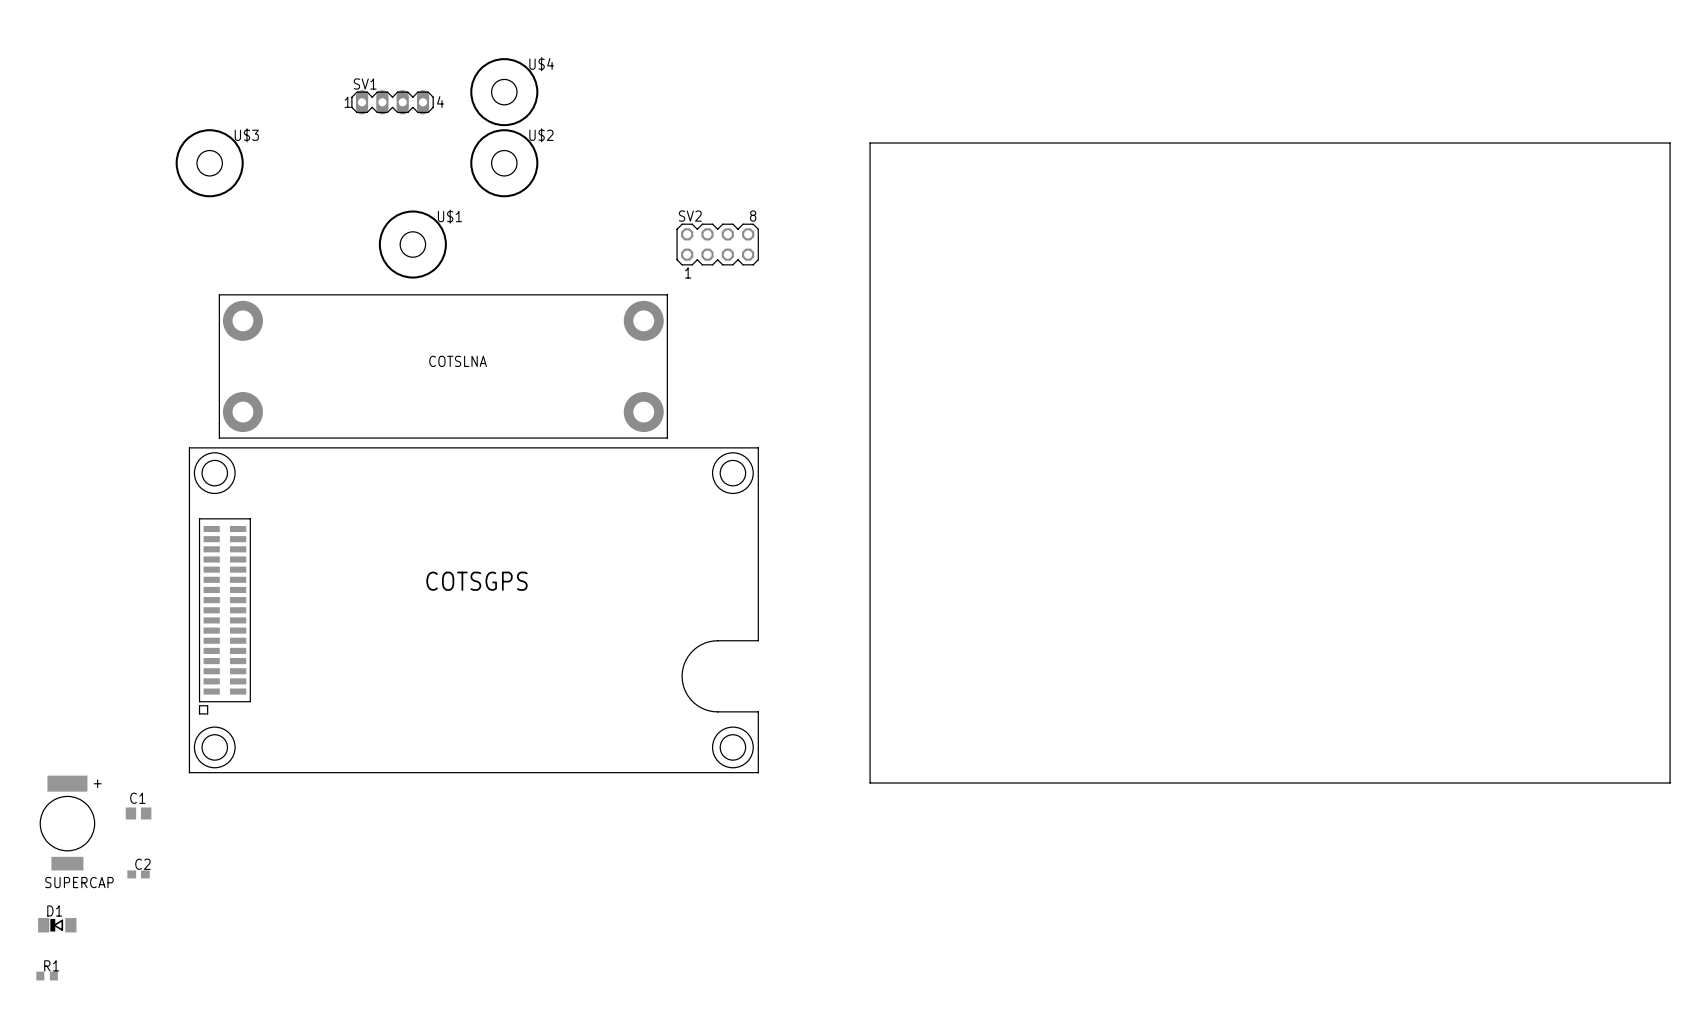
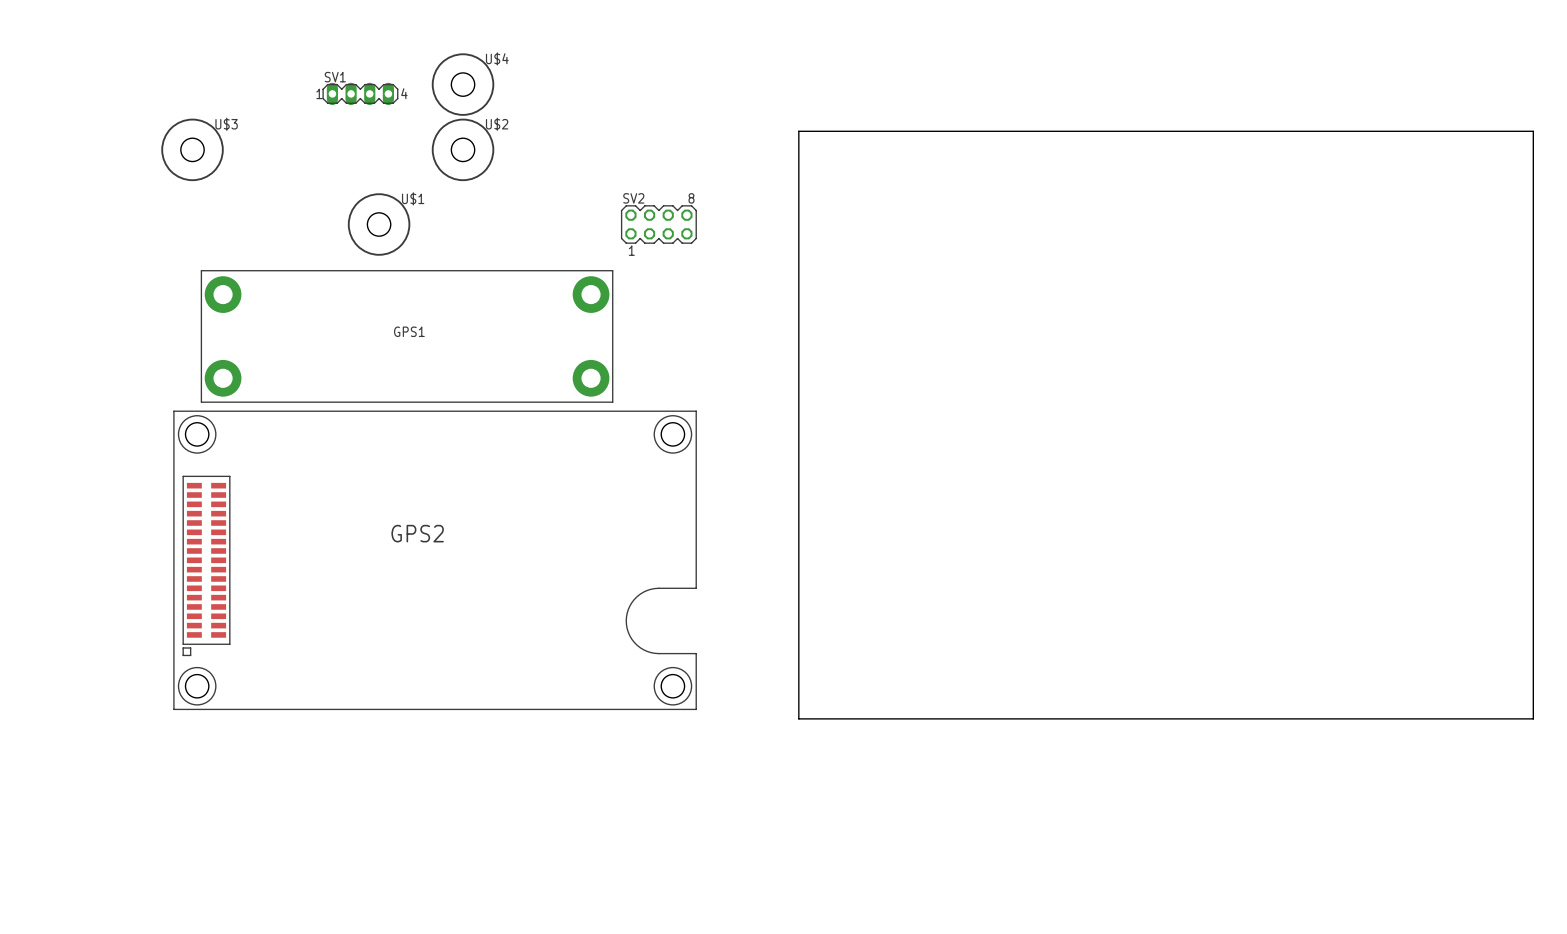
COTSLNA name: COTSLNA (458, 361) -> GPS1 (409, 331)
COTSGPS name: COTSGPS (476, 581) -> GPS2 (417, 533)
C1: (138, 813) -> none
SUPERCAP: (67, 823) -> none
C2: (138, 874) -> none
D1: (57, 925) -> none
R1: (47, 976) -> none

